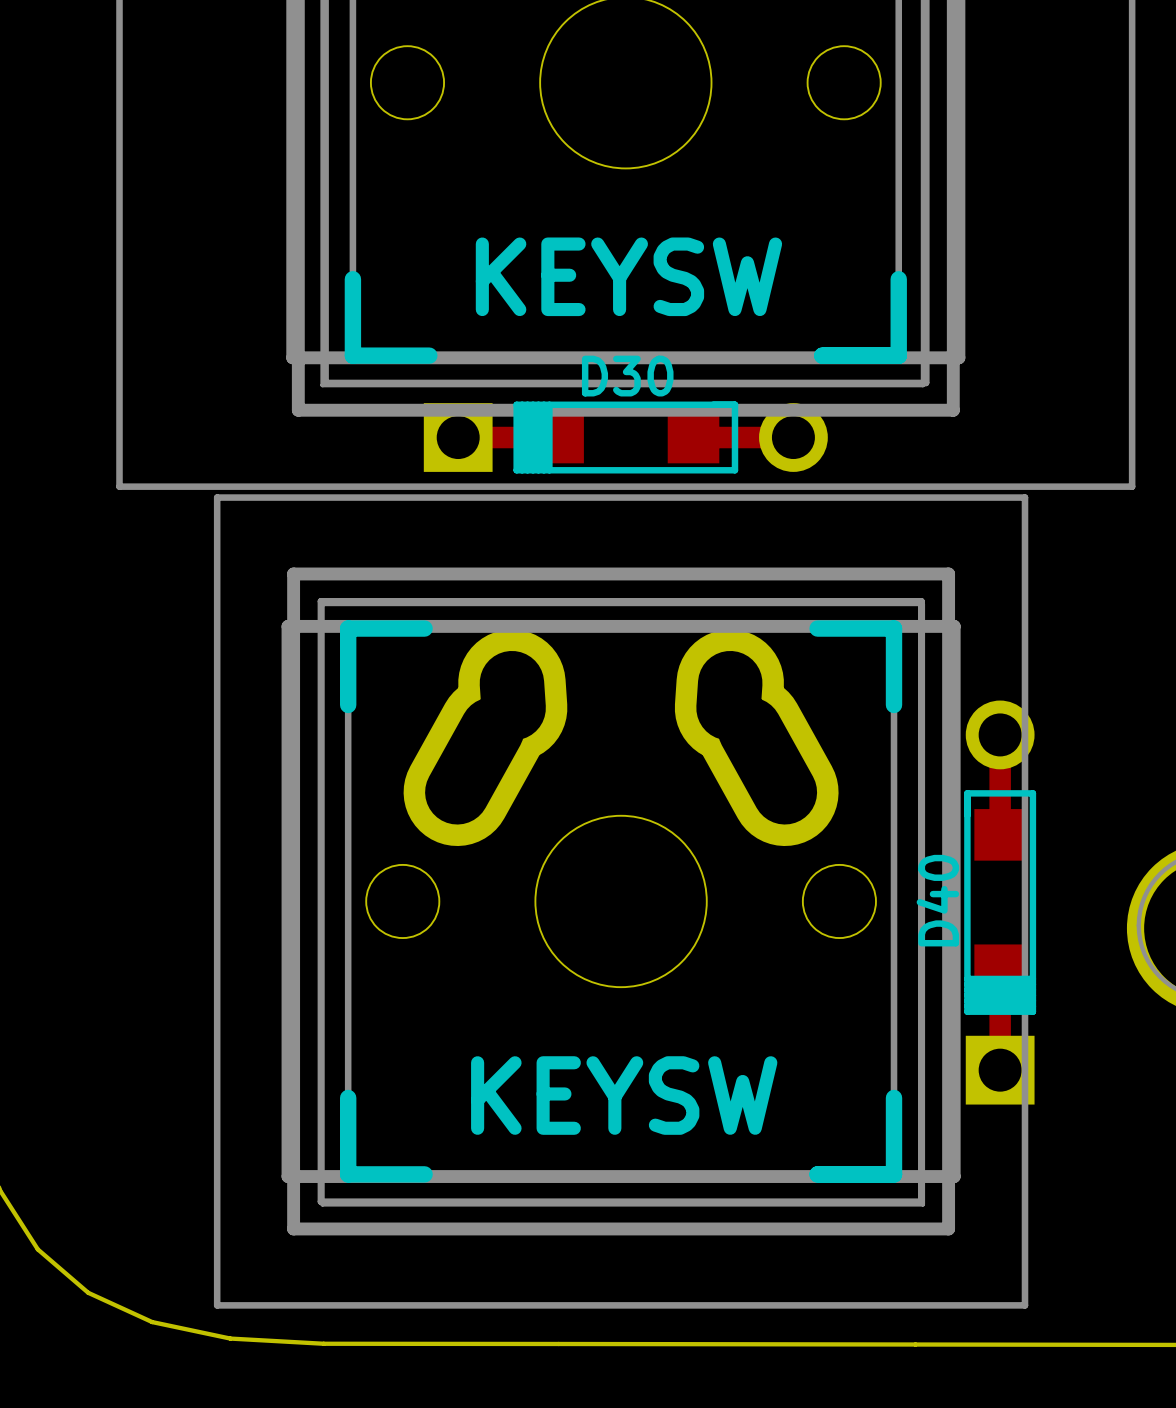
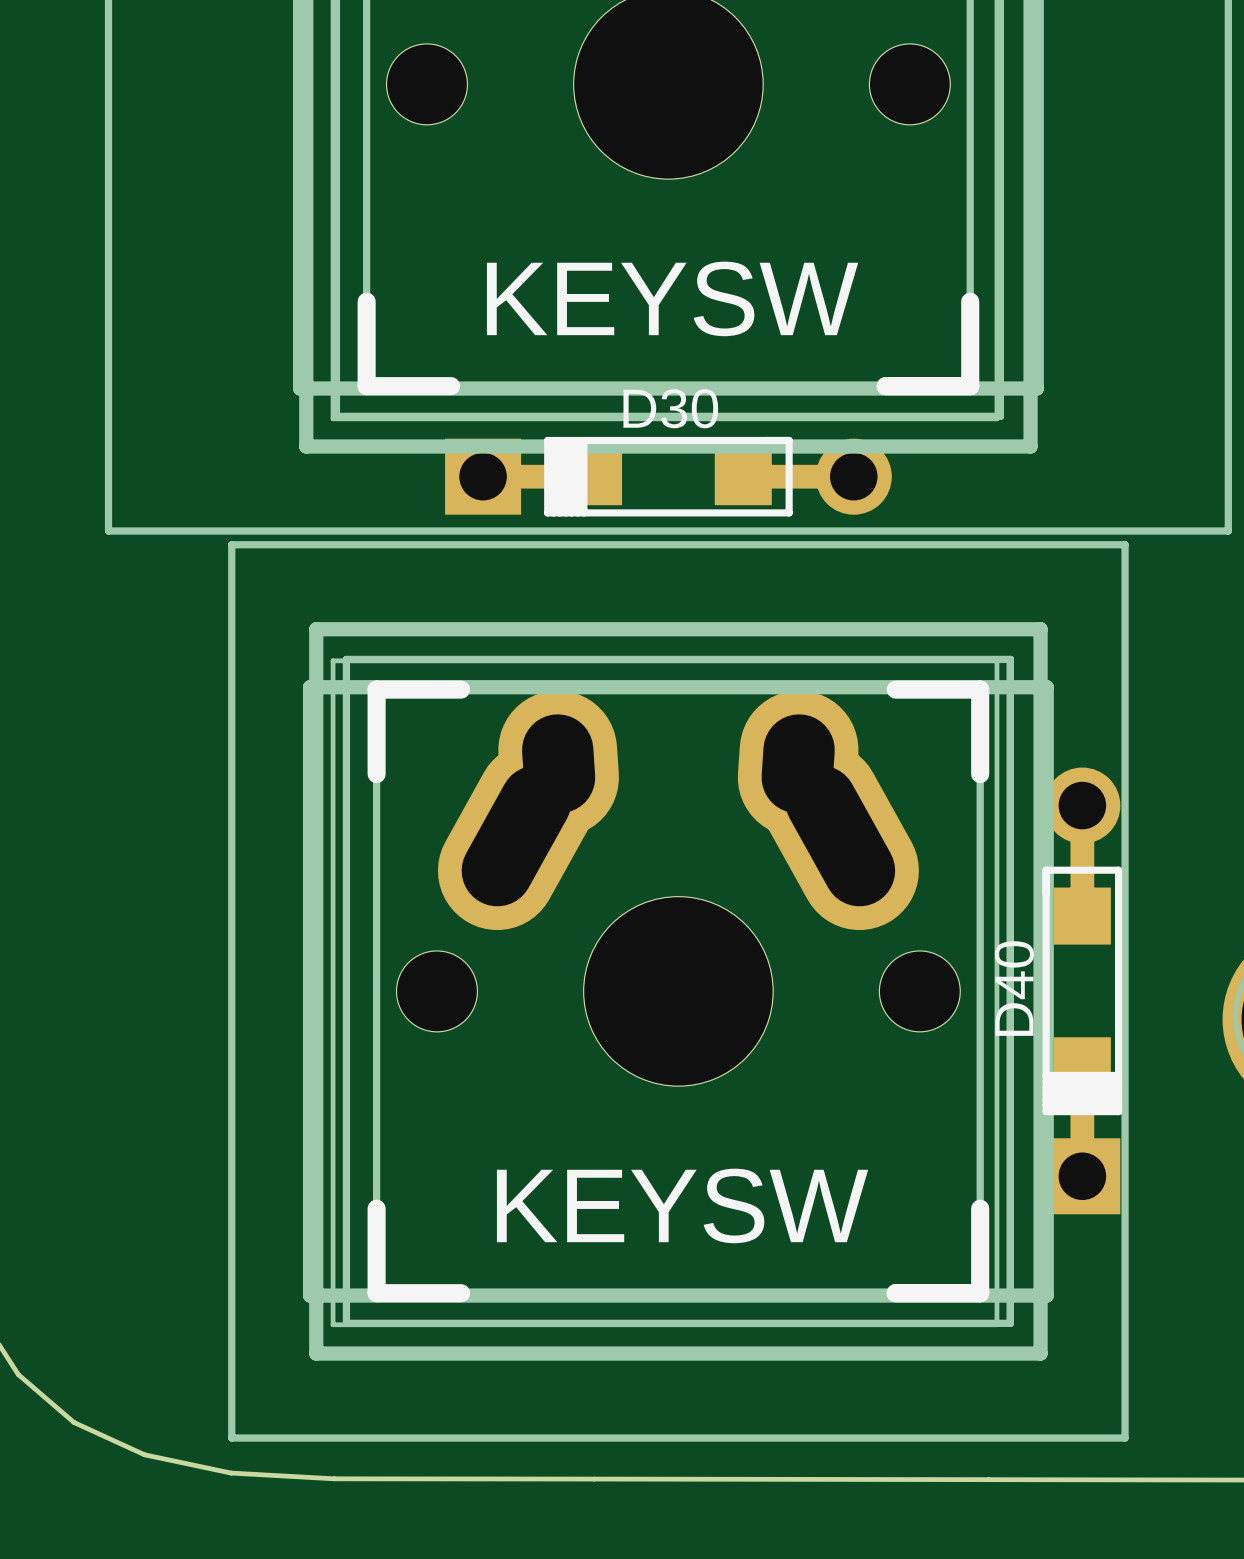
part position: (621, 901) -> (678, 991)

